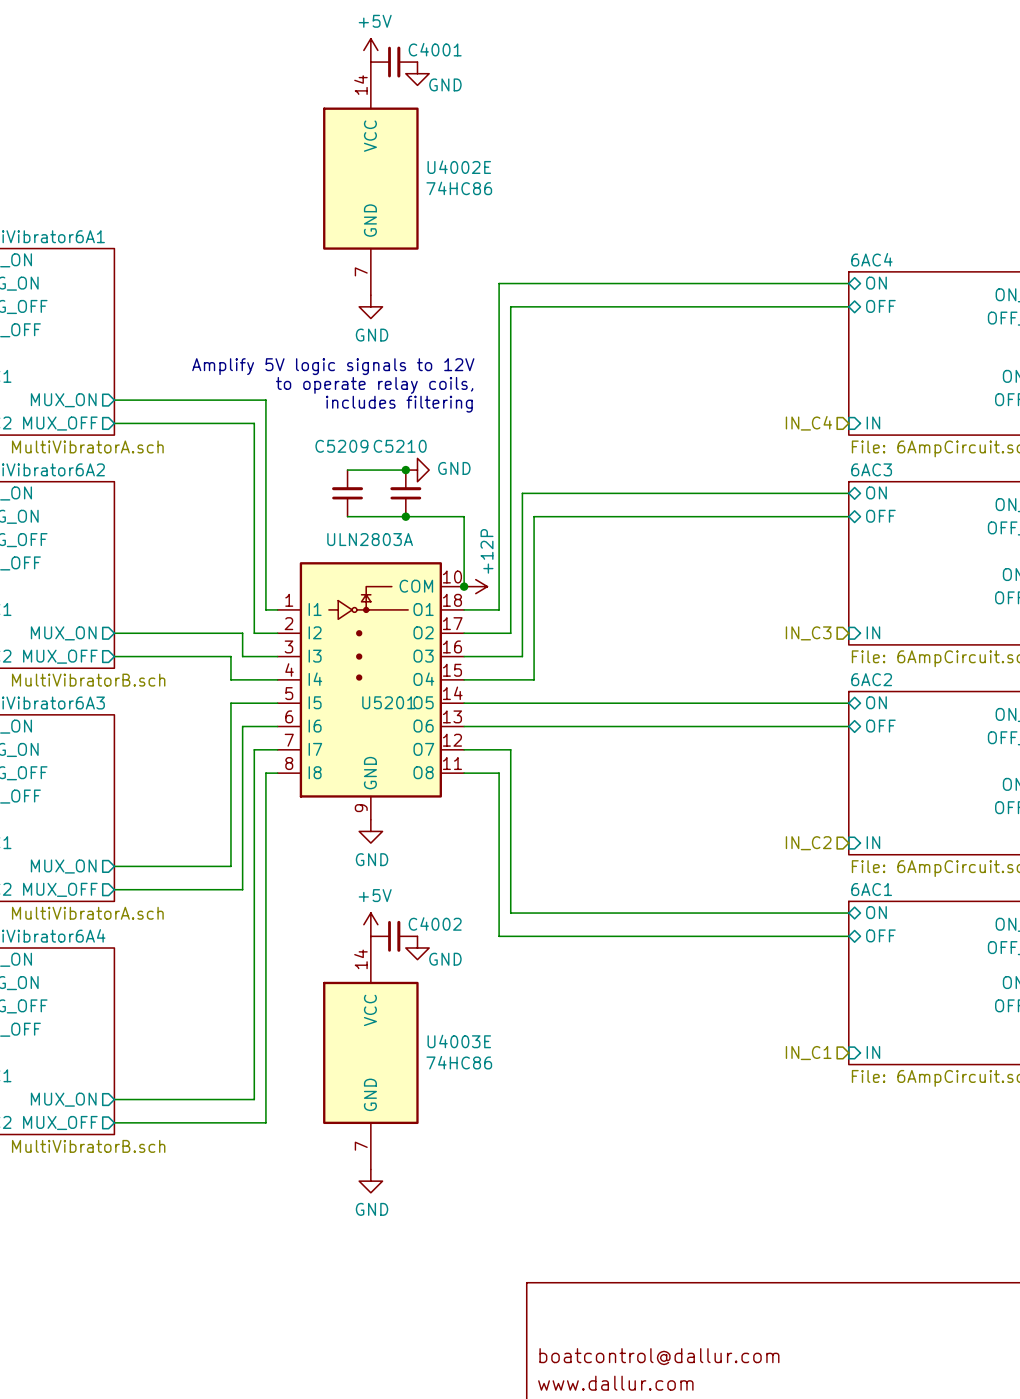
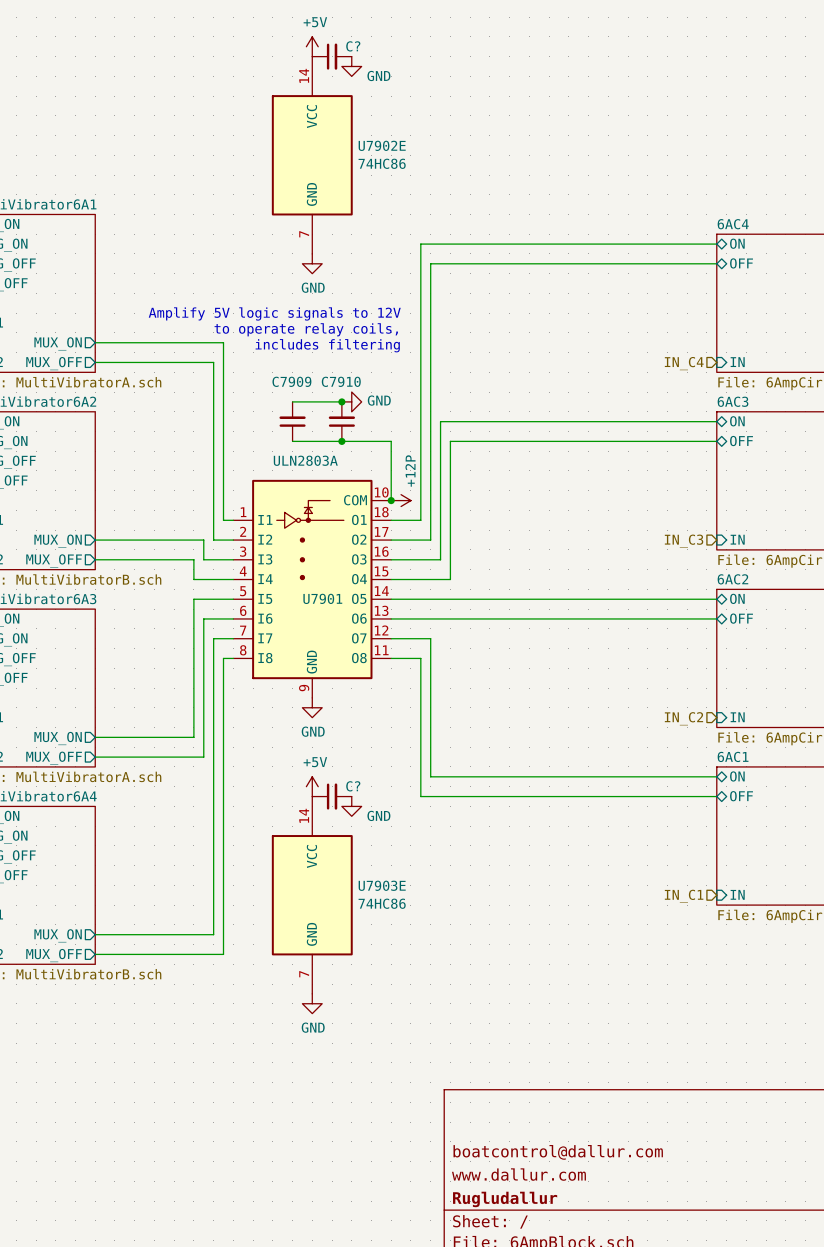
C4001 name: C4001 (435, 49) -> C? (353, 46)
U4002E name: U4002E (459, 167) -> U7902E (382, 145)
C5209 name: C5209 (341, 446) -> C7909 (291, 381)
C5210 name: C5210 (400, 446) -> C7910 (341, 381)
U5201 name: U5201 (388, 702) -> U7901 (322, 598)
C4002 name: C4002 (435, 923) -> C? (353, 786)
U4003E name: U4003E (459, 1041) -> U7903E (382, 885)

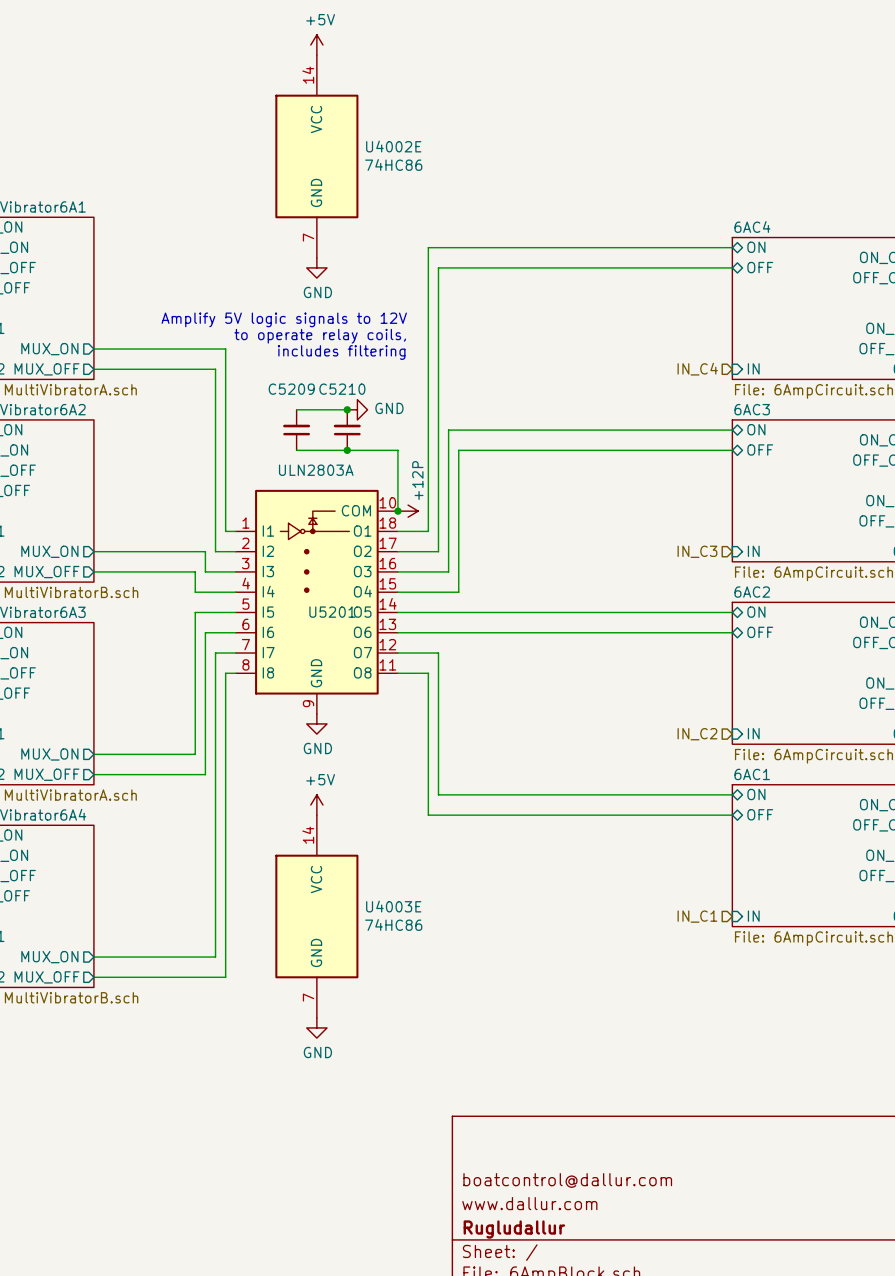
C?: (332, 56) -> none
power symbol: GND (351, 66) -> none
U7902E name: U7902E (382, 145) -> U4002E (393, 146)
C7909 name: C7909 (291, 381) -> C5209 (291, 389)
C7910 name: C7910 (341, 381) -> C5210 (342, 389)
U7901 name: U7901 (322, 598) -> U5201 (332, 612)
C?: (332, 796) -> none
power symbol: GND (351, 806) -> none
U7903E name: U7903E (382, 885) -> U4003E (393, 906)

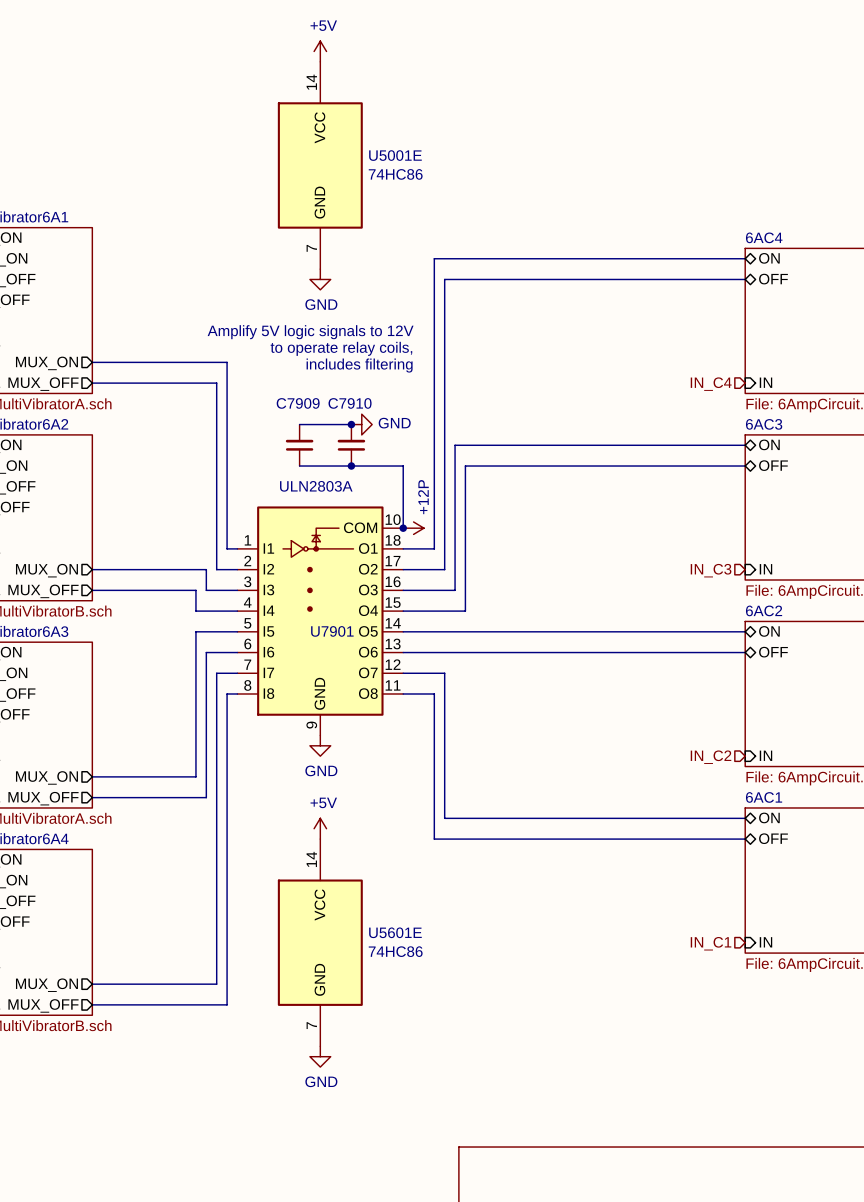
U4002E name: U4002E (393, 146) -> U5001E (395, 155)
C5209 name: C5209 (291, 389) -> C7909 (298, 403)
C5210 name: C5210 (342, 389) -> C7910 (350, 403)
U5201 name: U5201 (332, 612) -> U7901 (332, 631)
U4003E name: U4003E (393, 906) -> U5601E (395, 932)

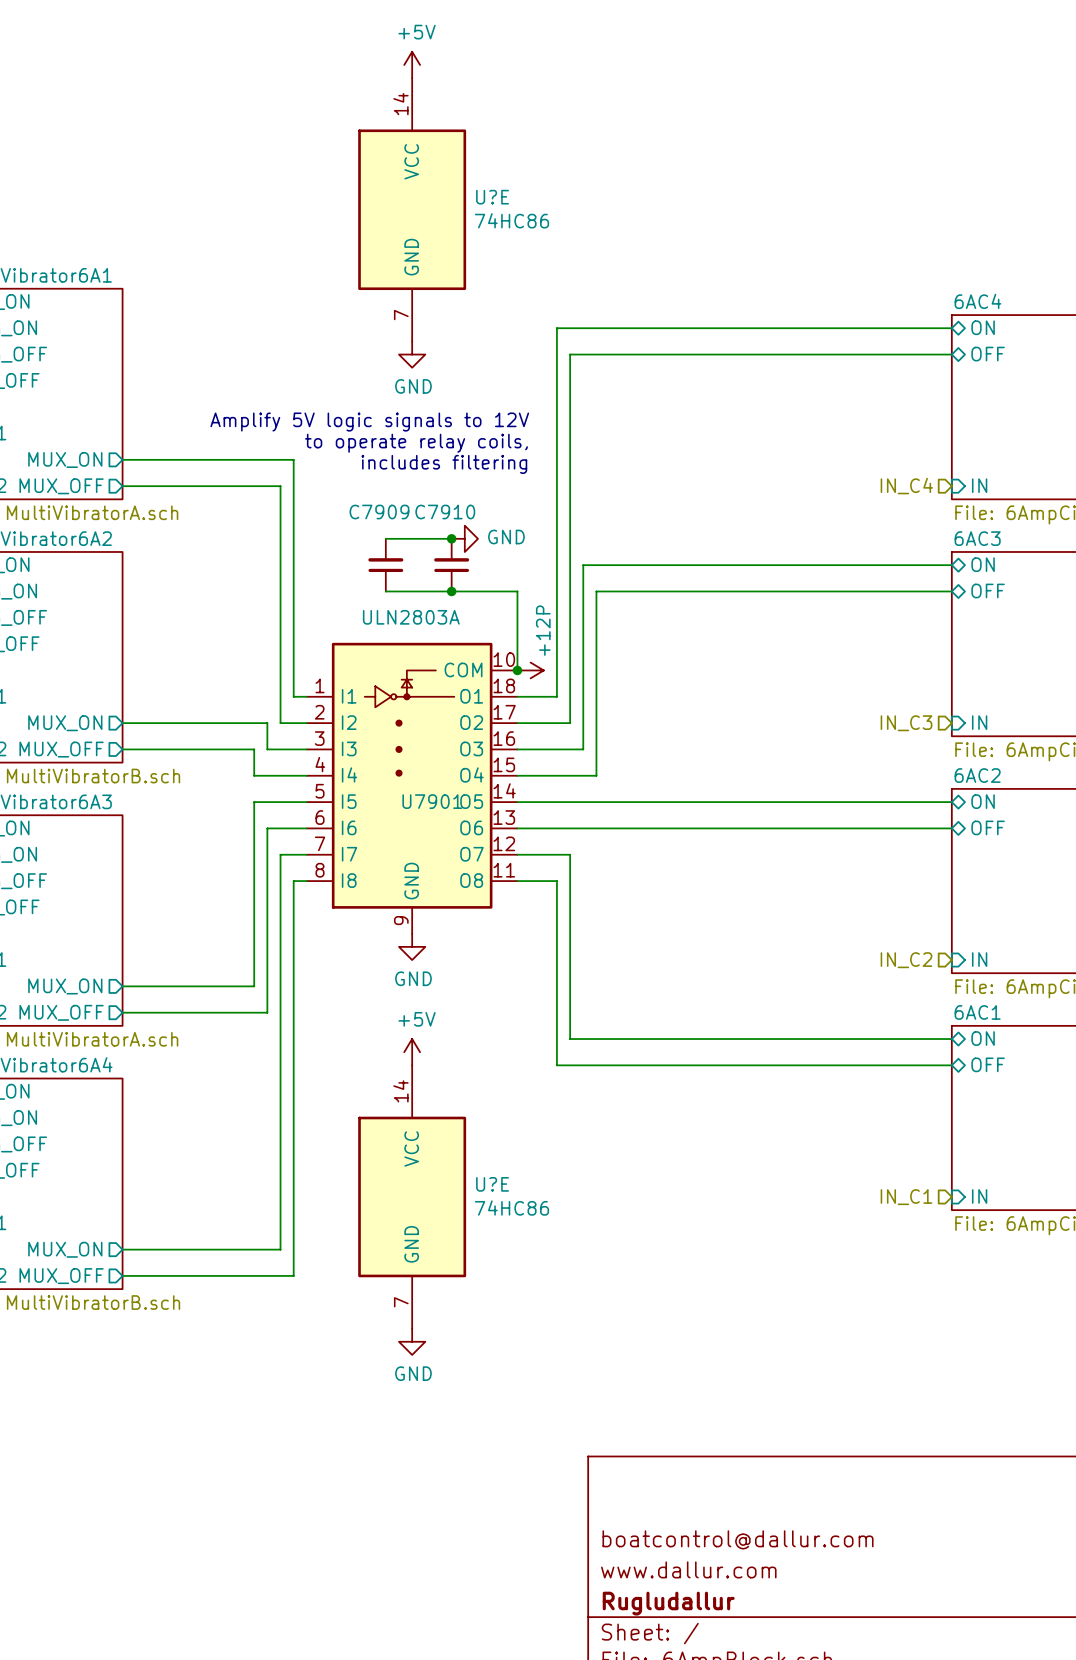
U5001E name: U5001E (395, 155) -> U?E (492, 197)
U5601E name: U5601E (395, 932) -> U?E (492, 1184)

